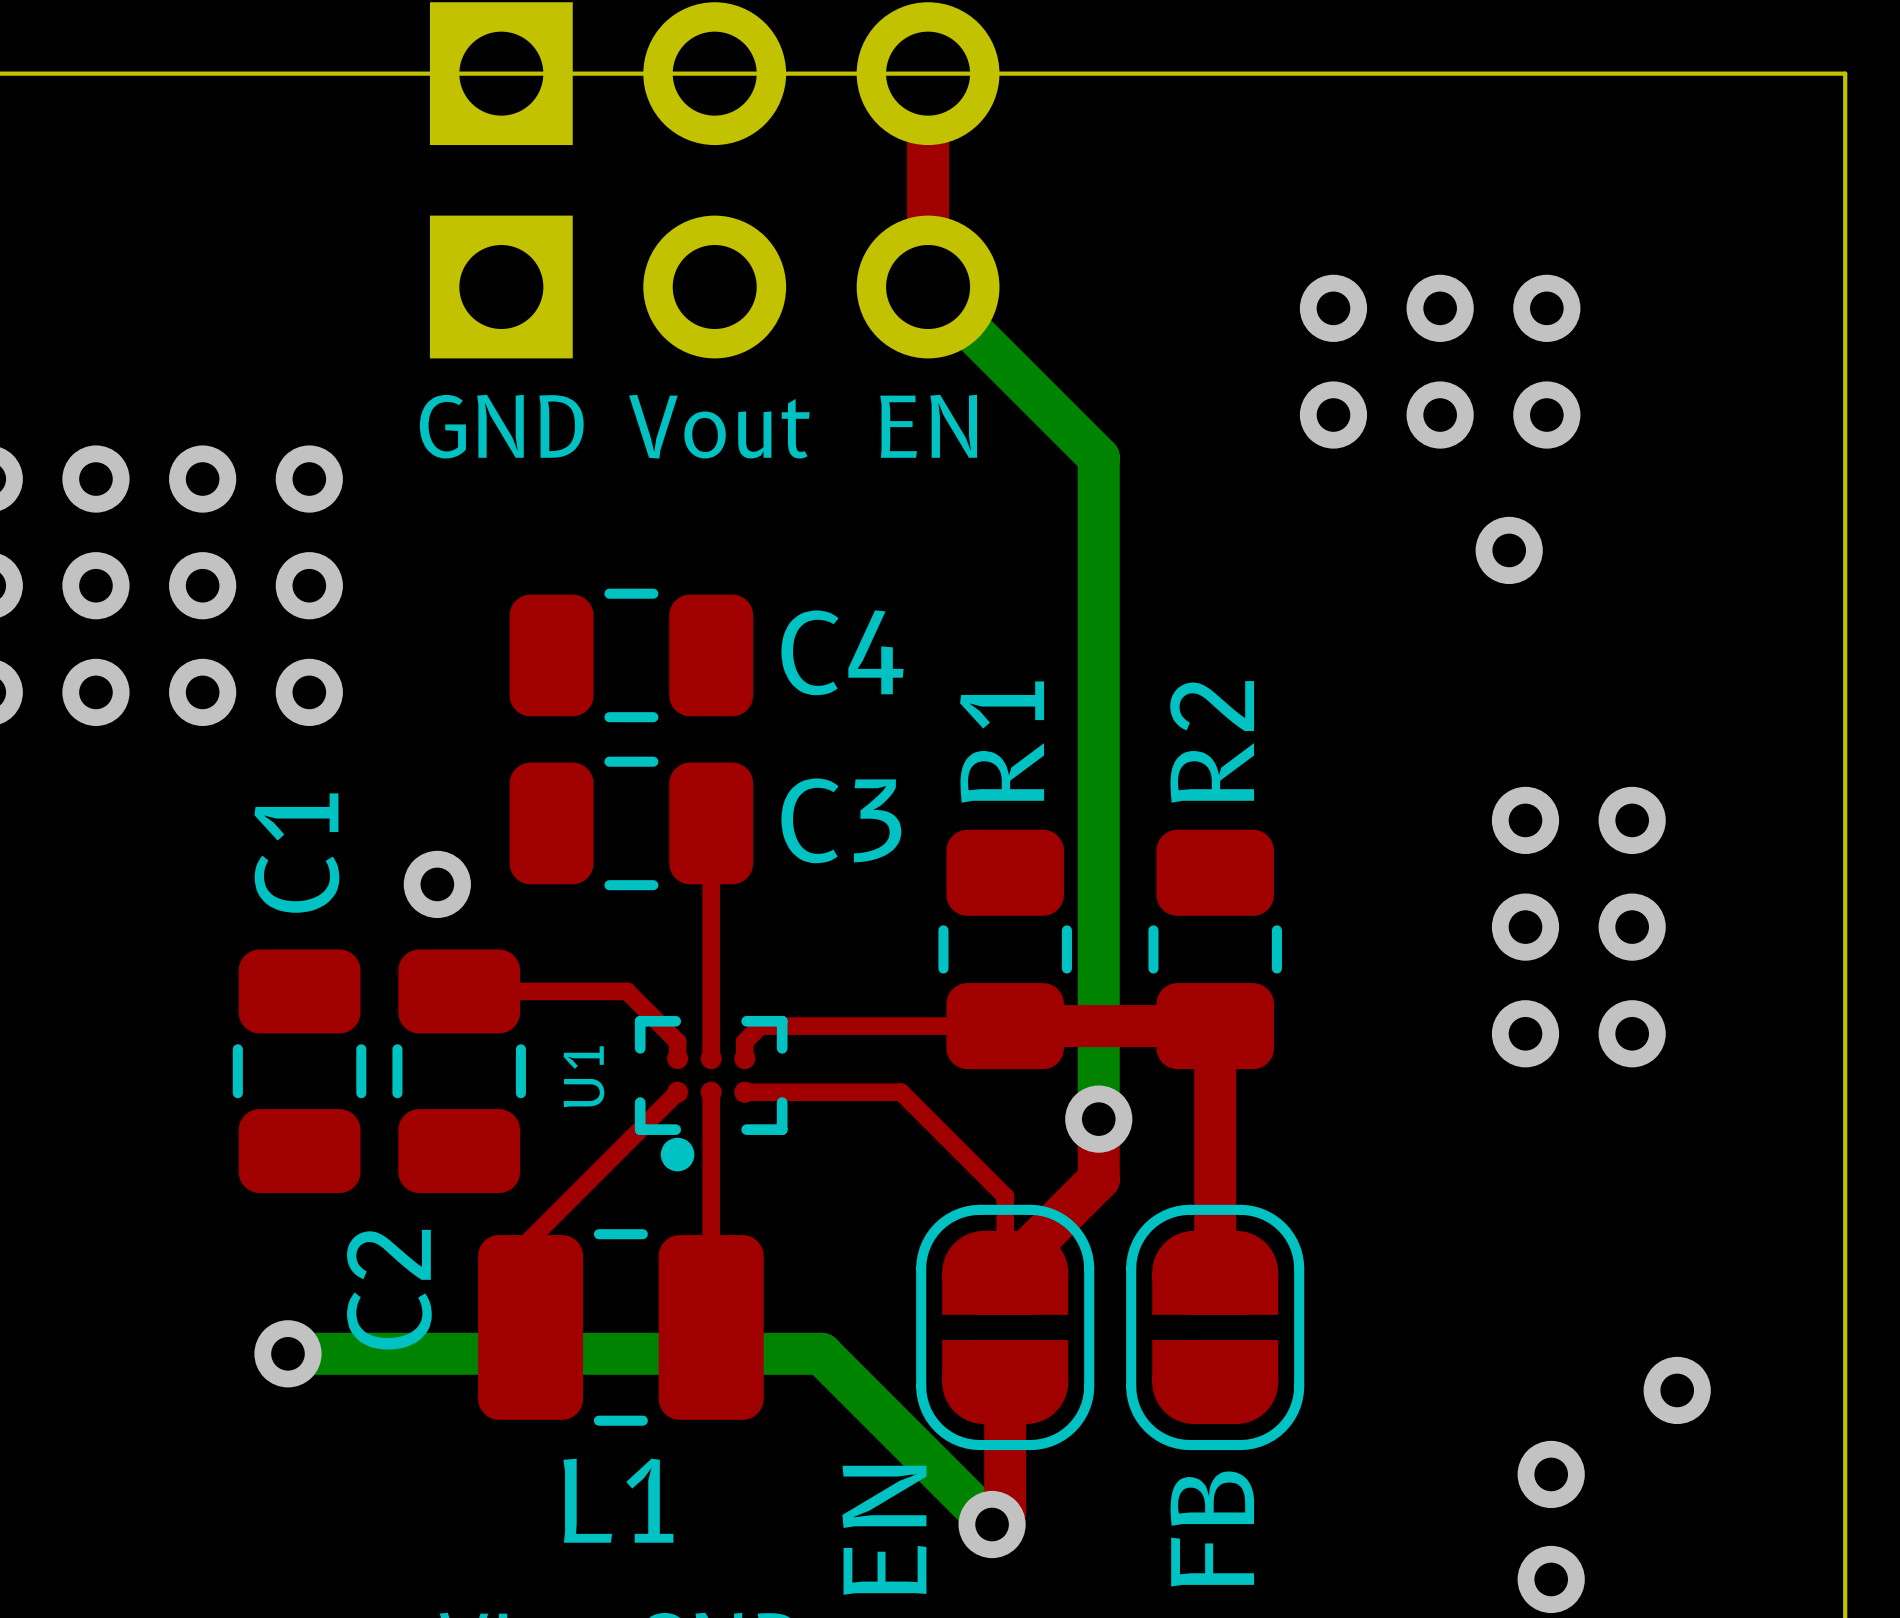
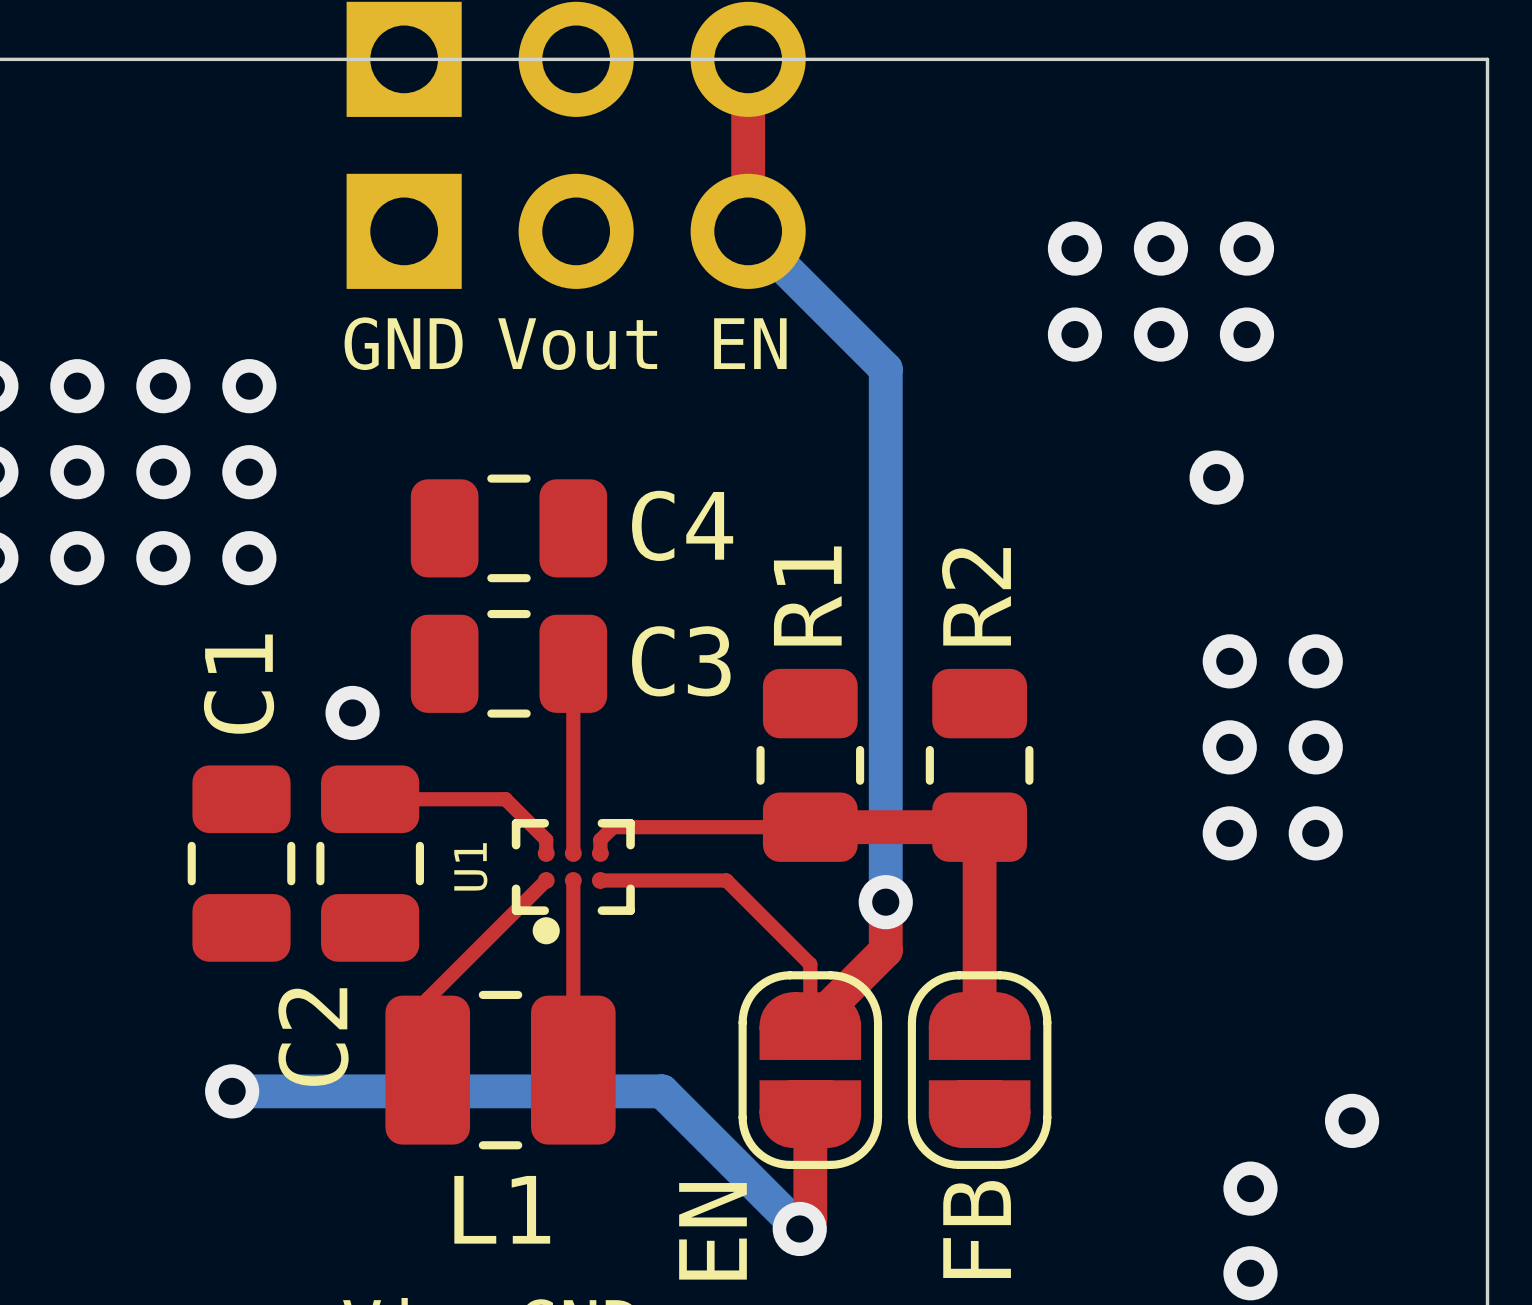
via position: (1509, 550) -> (1216, 477)

